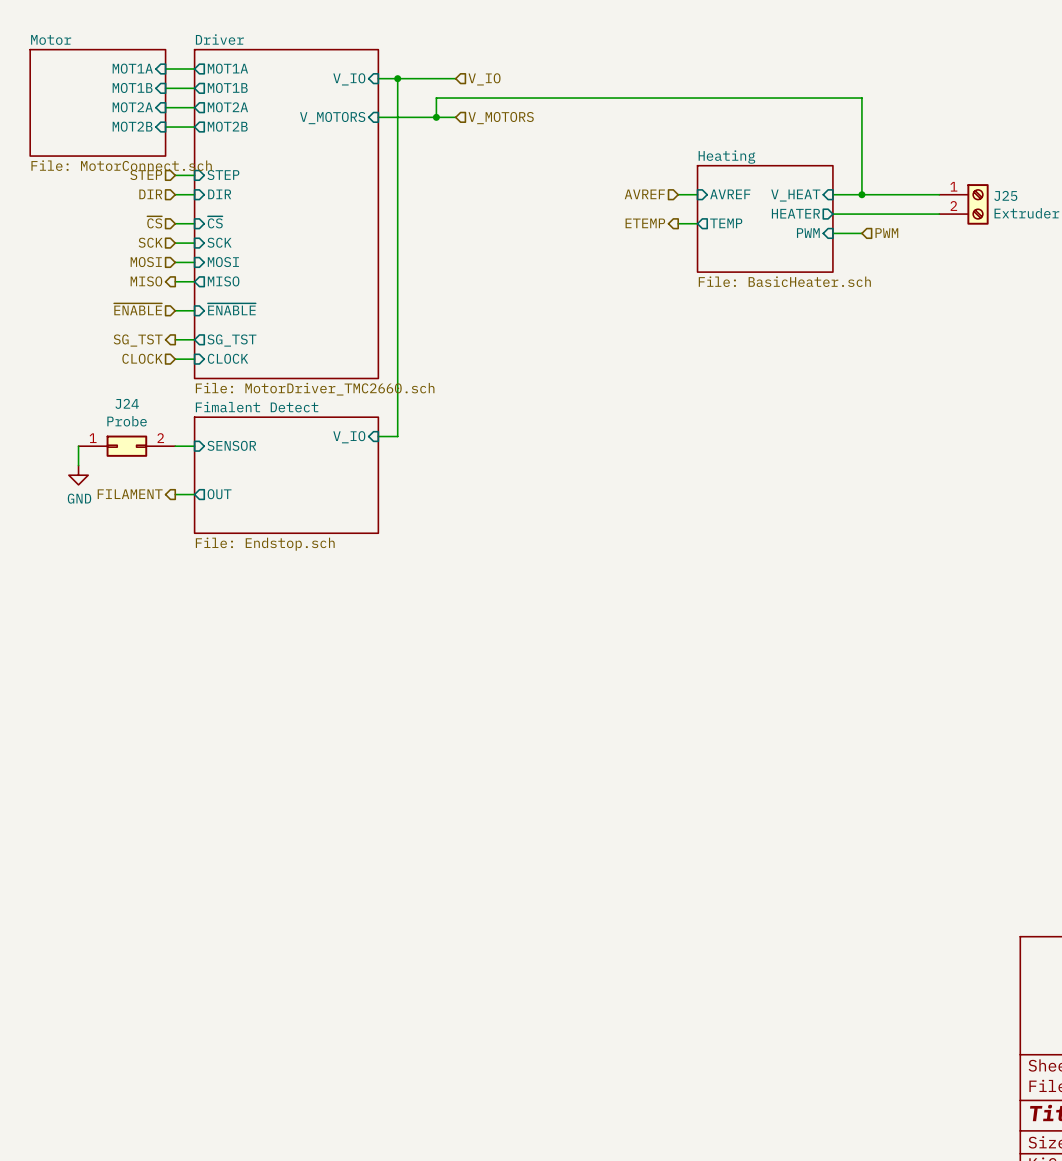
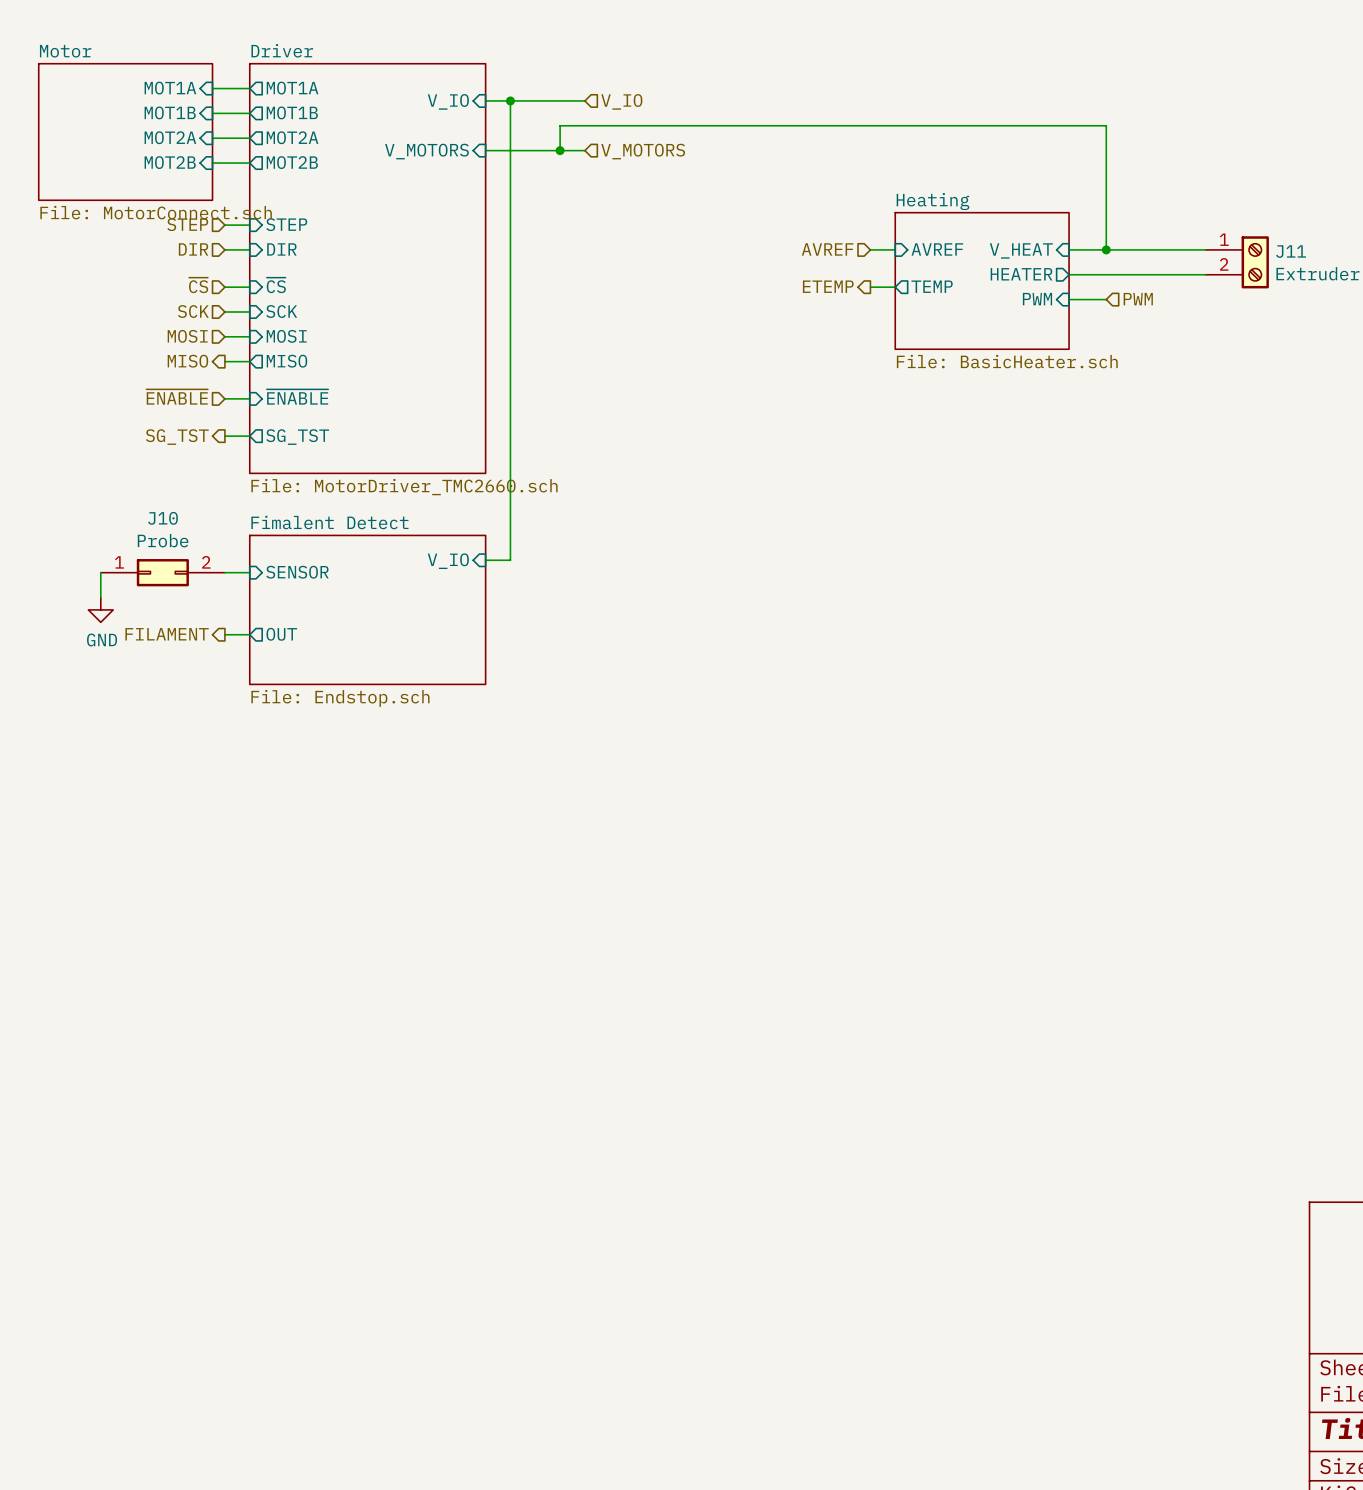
sheet Driver shape: [194, 49, 379, 379] -> [249, 63, 486, 474]
J25 name: J25 (1005, 195) -> J11 (1291, 251)
hierarchical label: CLOCK (142, 358) -> none
sheet pin: CLOCK (228, 358) -> none
wire: (175, 359) (194, 359) -> none
J24 name: J24 (127, 403) -> J10 (163, 518)

